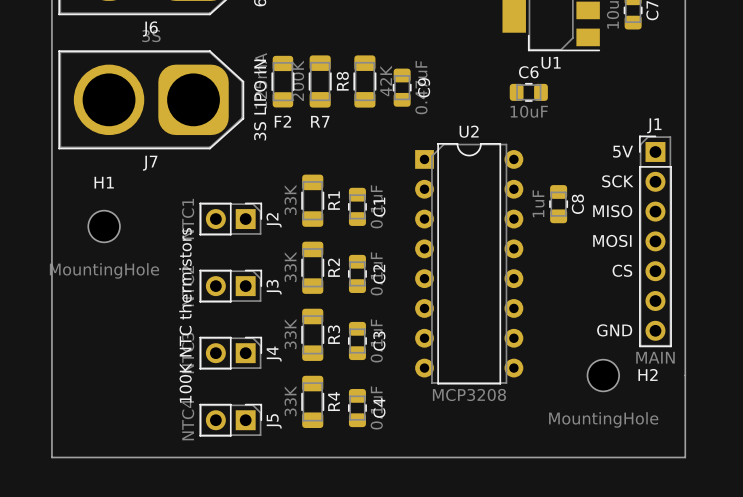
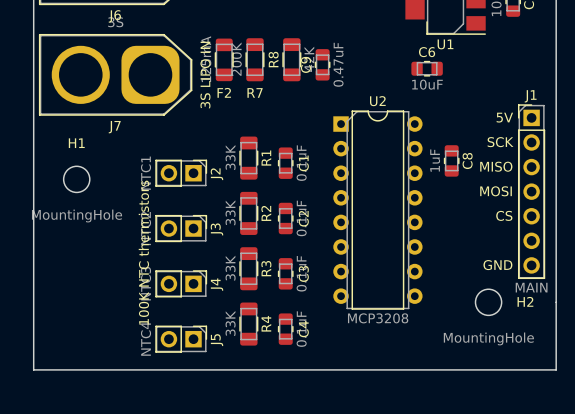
C9 name position: C9 (424, 87) -> C9 (305, 64)

